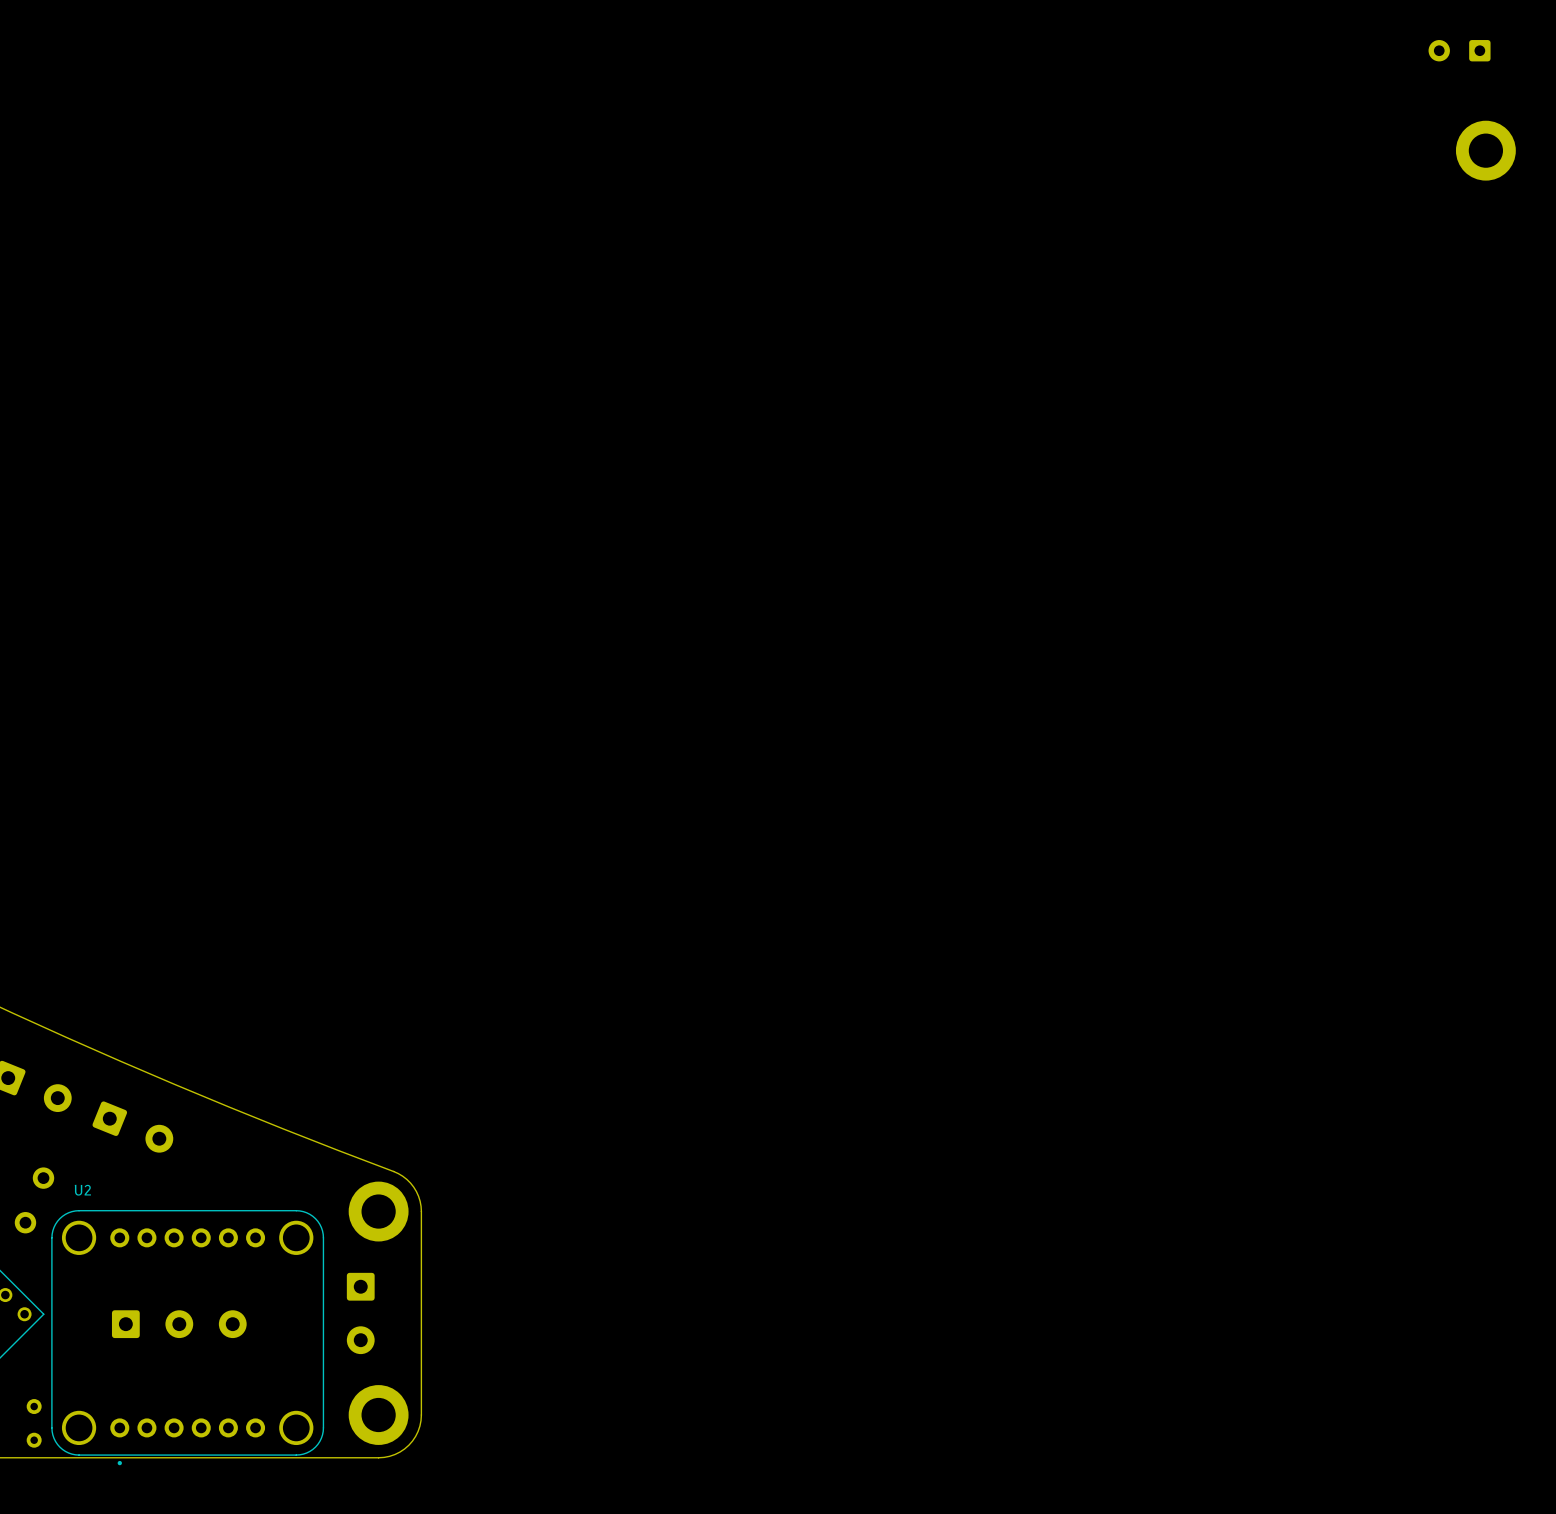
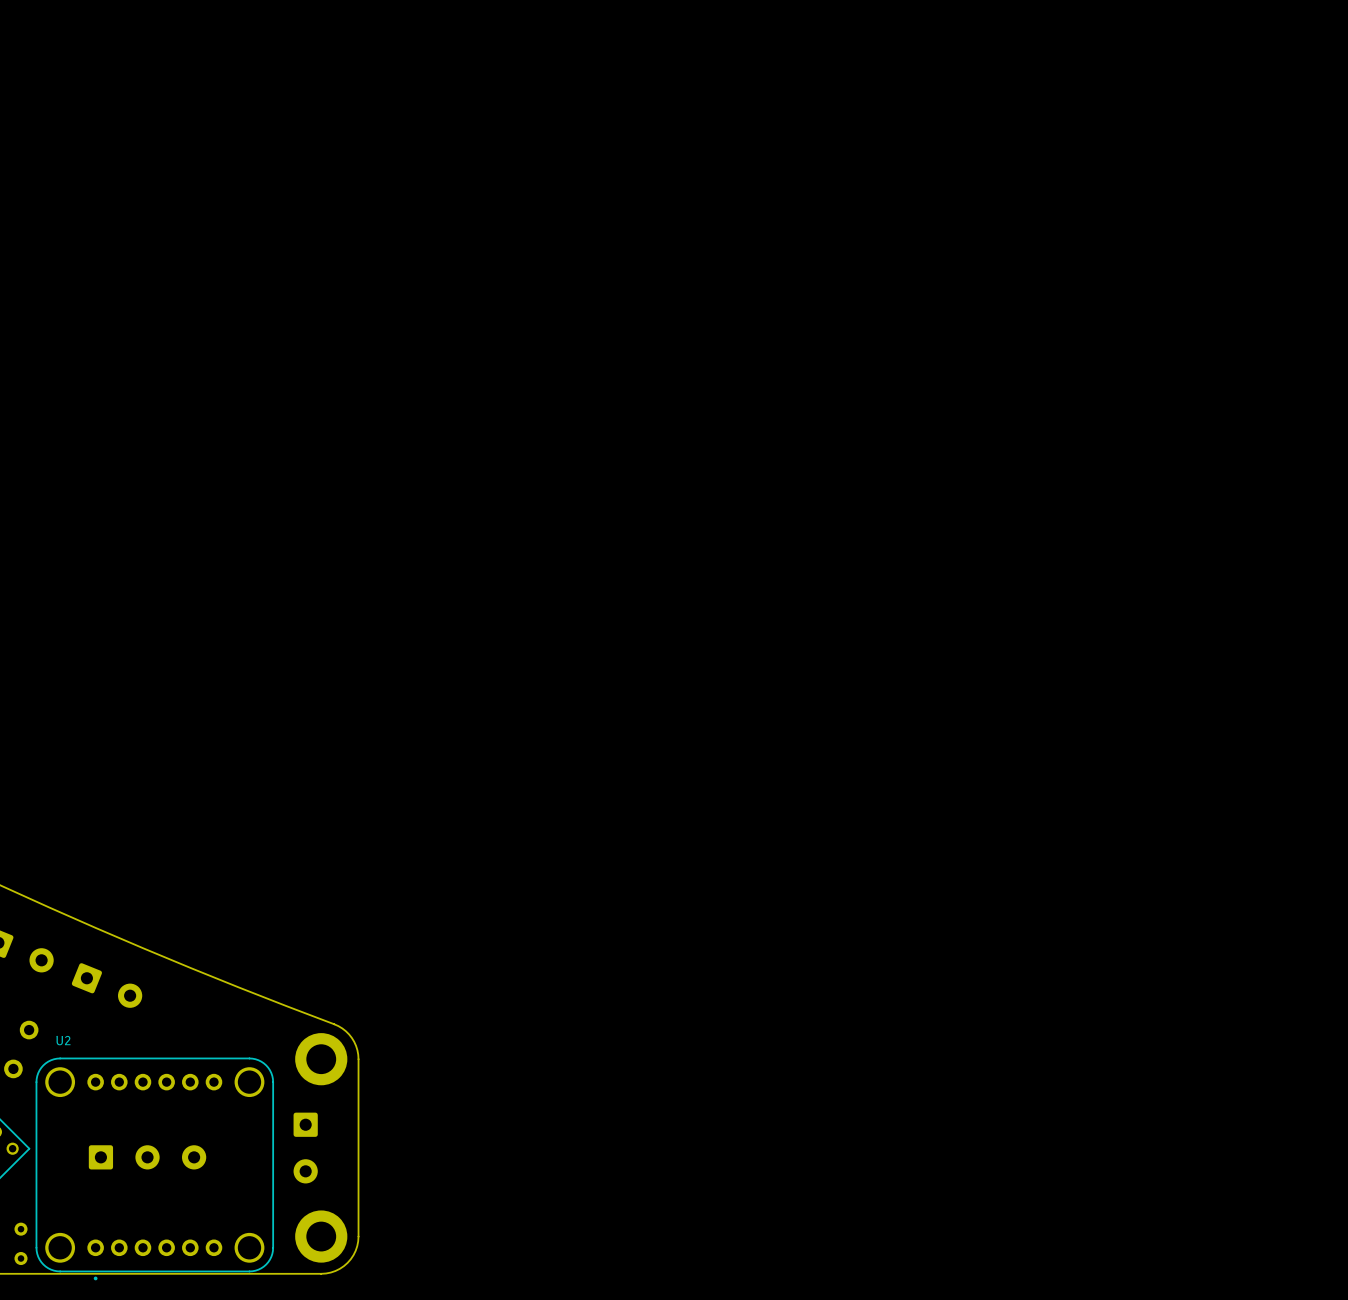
part: (1459, 50) -> none
part: (1485, 150) -> none

